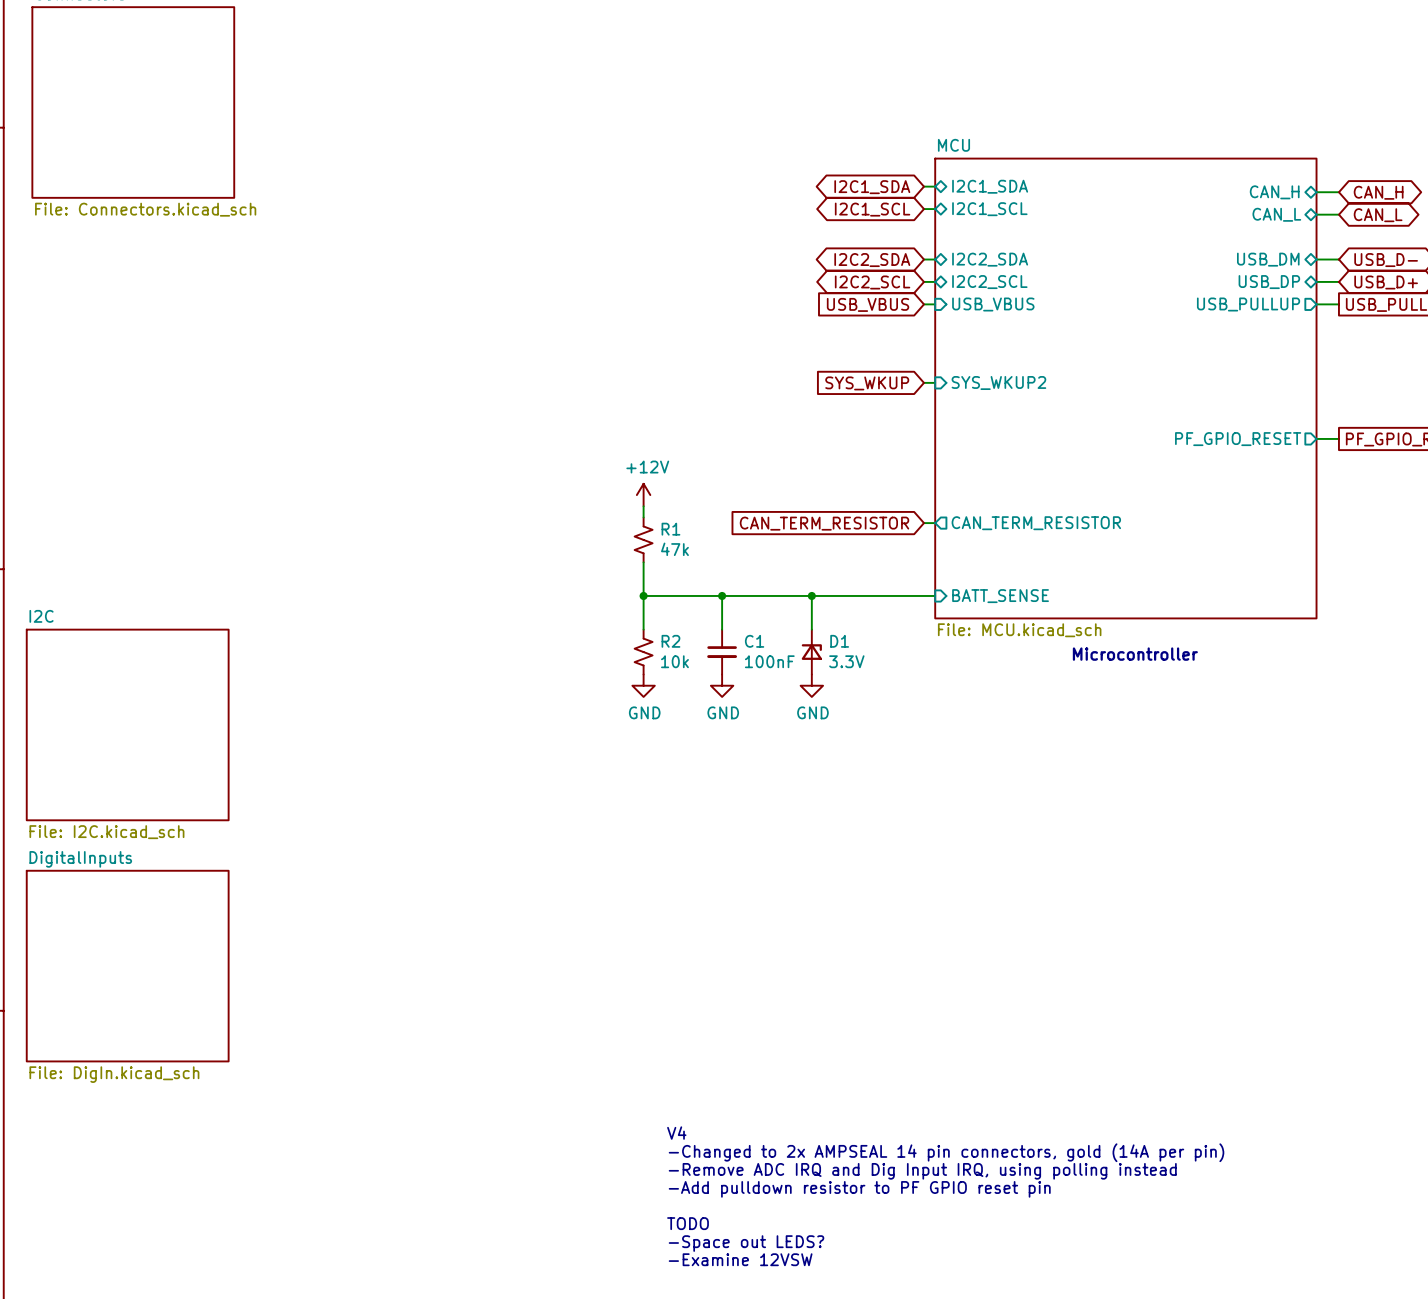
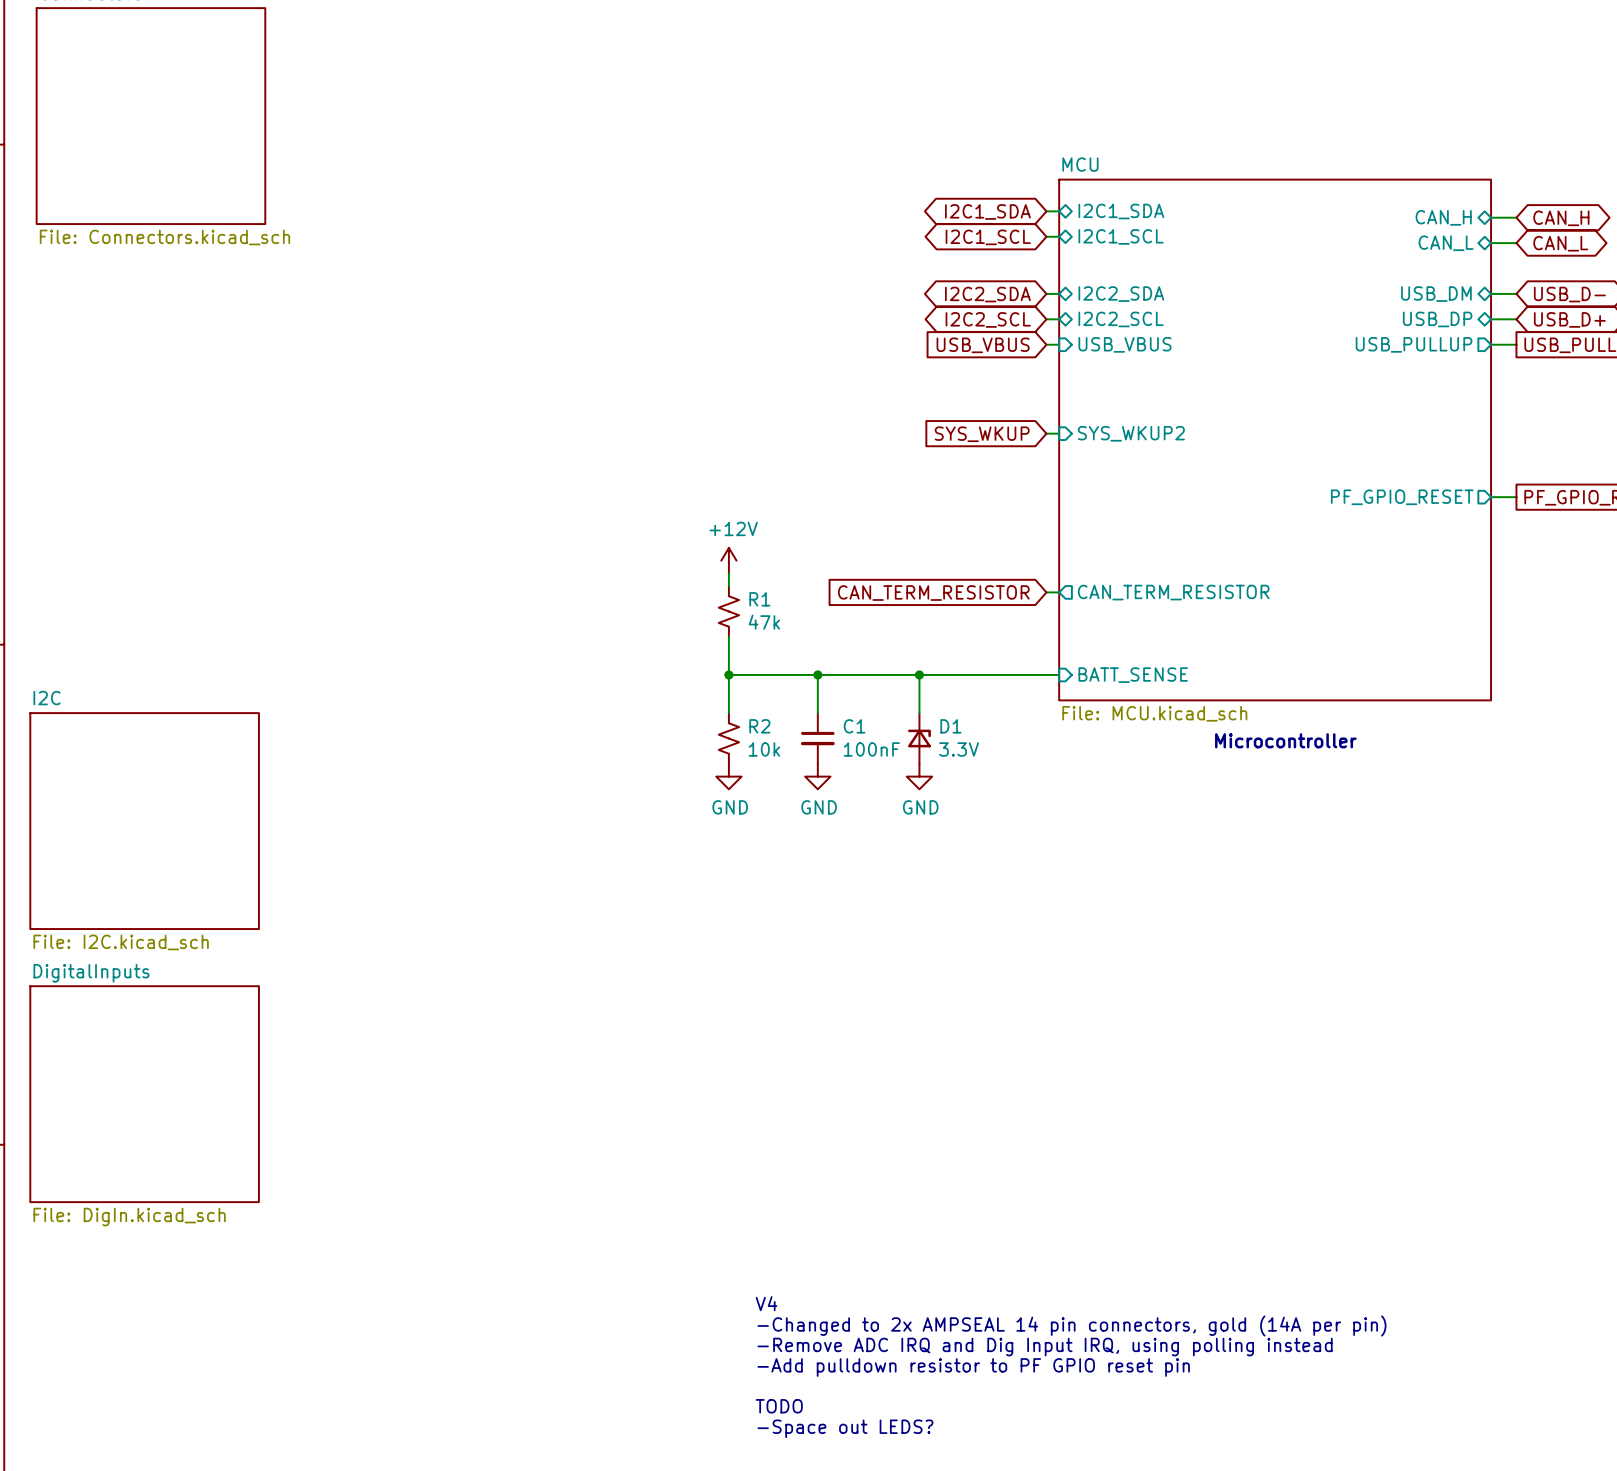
text: V4 (676, 1133) -> none
text: -Changed to 2x AMPSEAL 14 pin connectors, gold (14A per pin) (946, 1152) -> V4 (766, 1303)
text: -Remove ADC IRQ and Dig Input IRQ, using polling instead (922, 1171) -> -Changed to 2x AMPSEAL 14 pin connectors, gold (14A per pin) (1071, 1325)
text: -Add pulldown resistor to PF GPIO reset pin (859, 1189) -> -Remove ADC IRQ and Dig Input IRQ, using polling instead (1045, 1347)
text: none -> -Add pulldown resistor to PF GPIO reset pin (973, 1367)
text: TODO (688, 1223) -> none
text: -Space out LEDS? (746, 1243) -> TODO (779, 1406)
text: -Examine 12VSW (740, 1259) -> -Space out LEDS? (845, 1428)

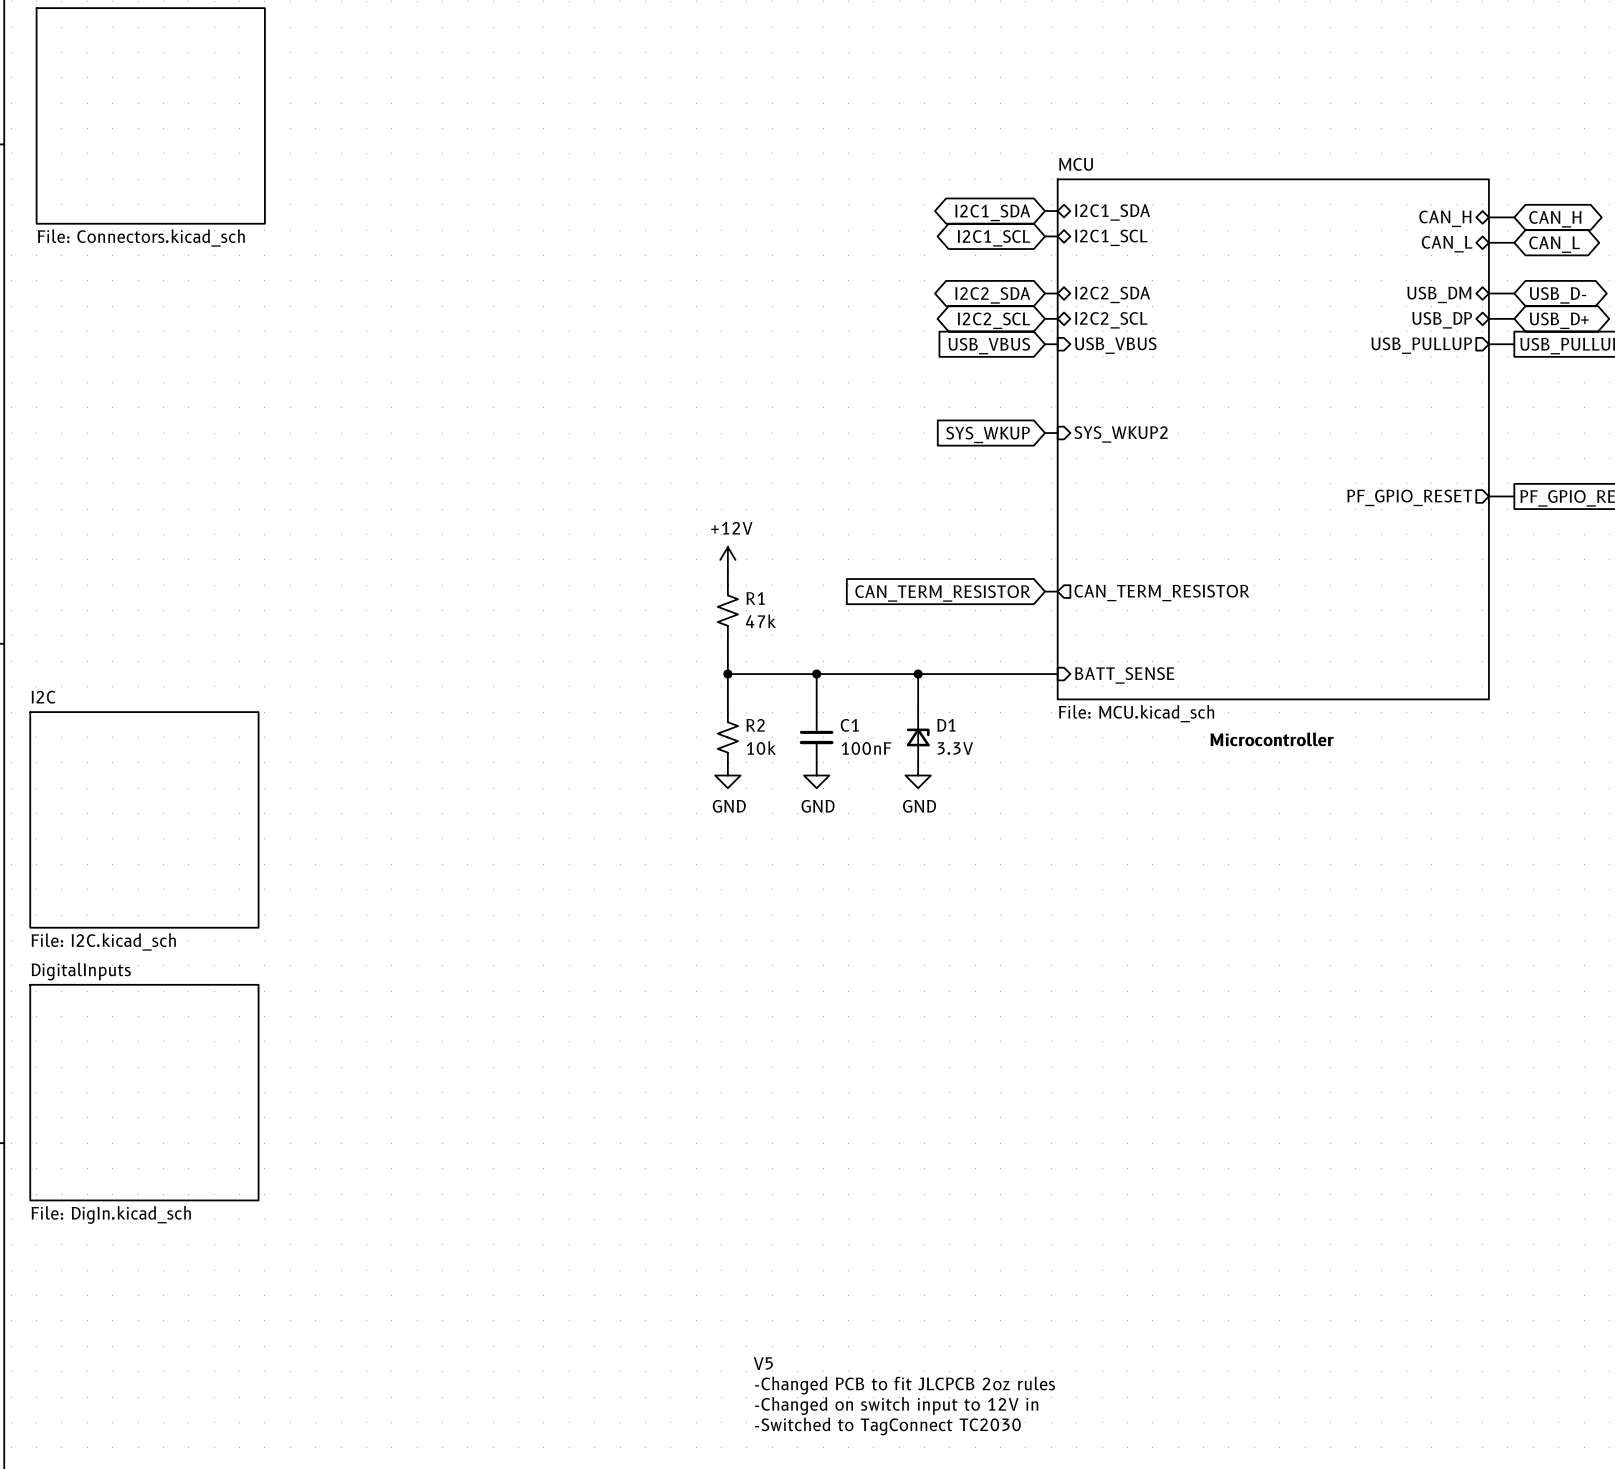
text: V4 (766, 1303) -> none
text: -Changed to 2x AMPSEAL 14 pin connectors, gold (14A per pin) (1071, 1325) -> none
text: -Remove ADC IRQ and Dig Input IRQ, using polling instead (1045, 1347) -> none
text: -Add pulldown resistor to PF GPIO reset pin (973, 1367) -> V5 (763, 1363)
text: none -> -Changed PCB to fit JLCPCB 2oz rules (904, 1385)
text: TODO (779, 1406) -> -Changed on switch input to 12V in (896, 1406)
text: -Space out LEDS? (845, 1428) -> -Switched to TagConnect TC2030 (887, 1426)

